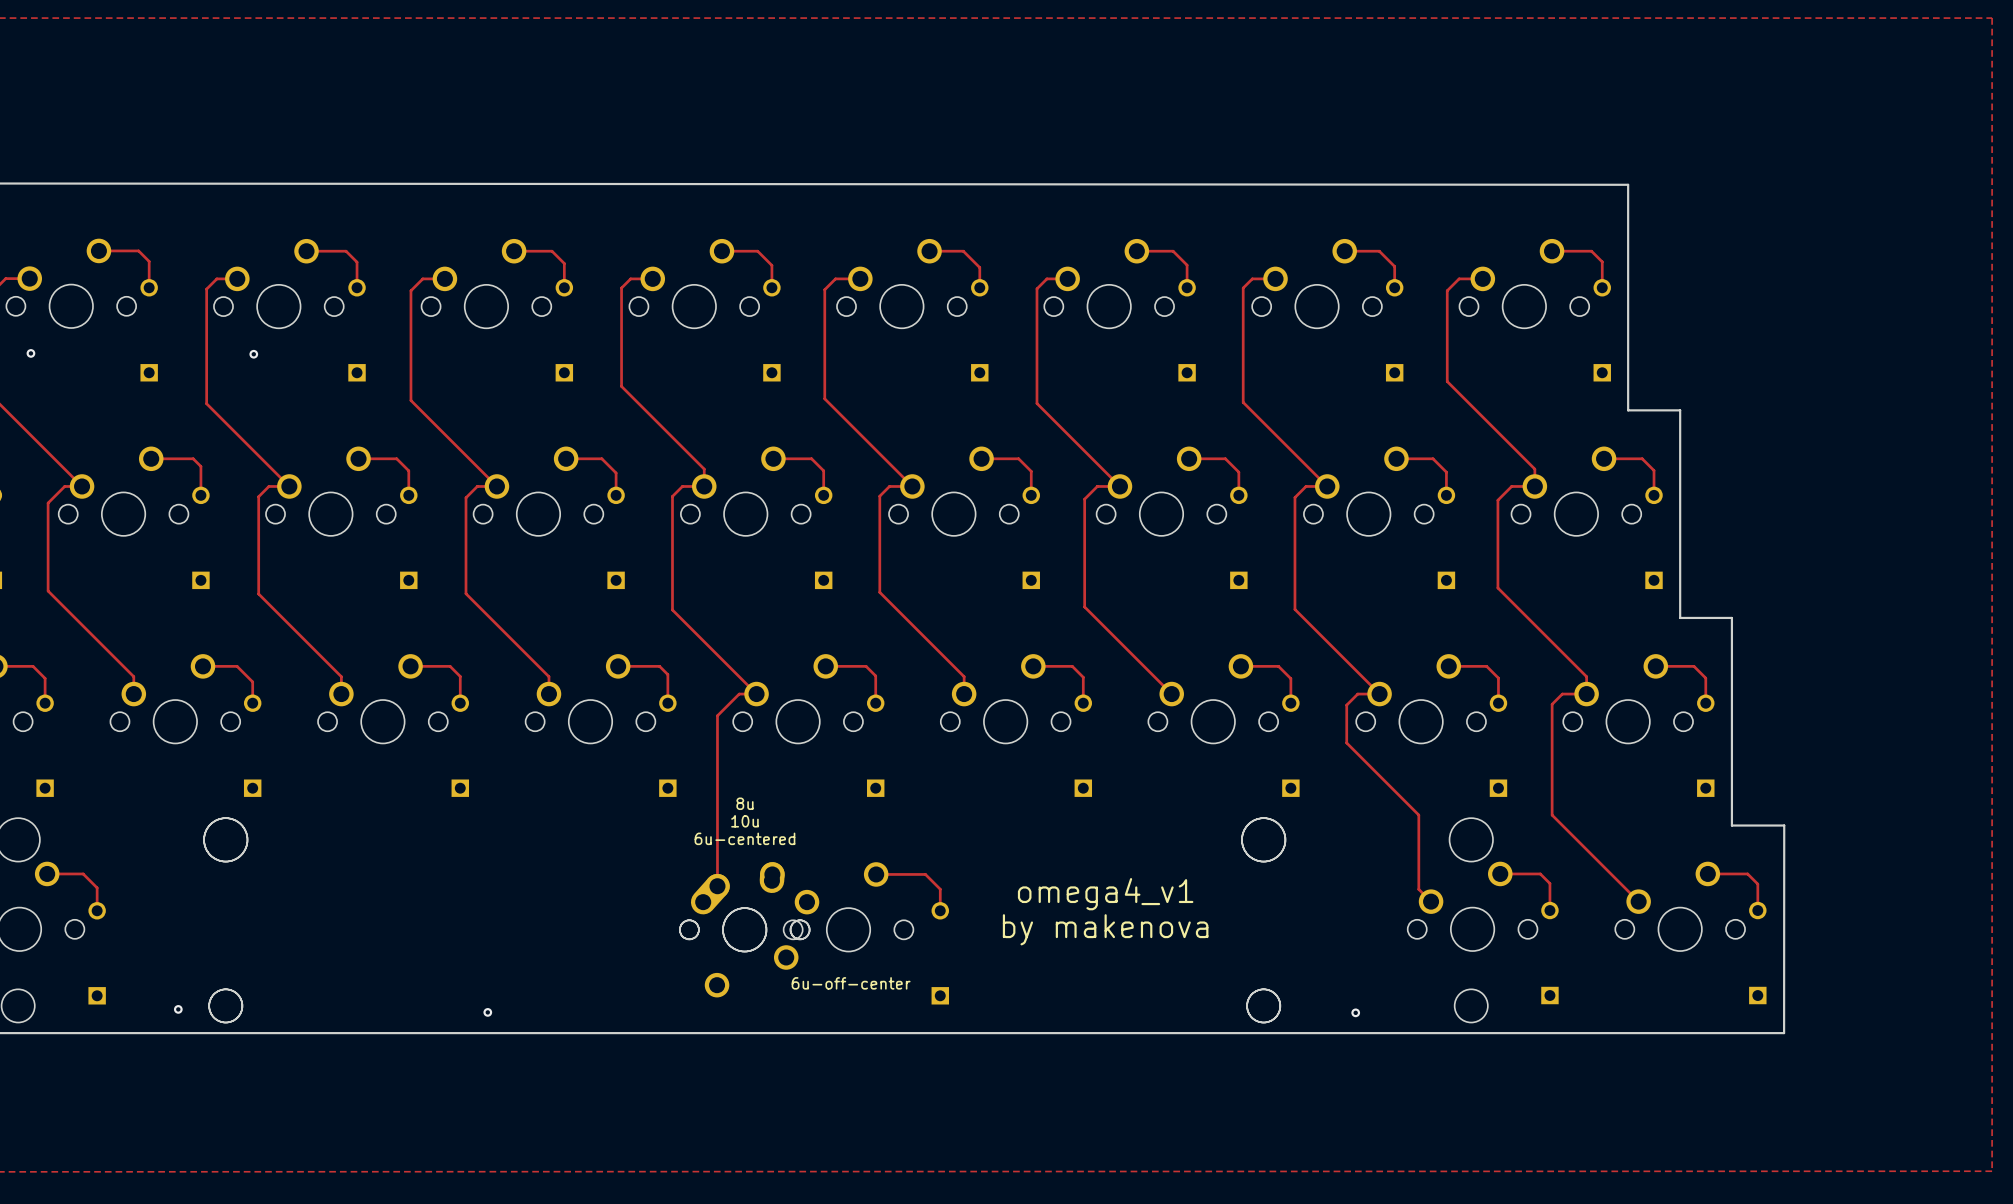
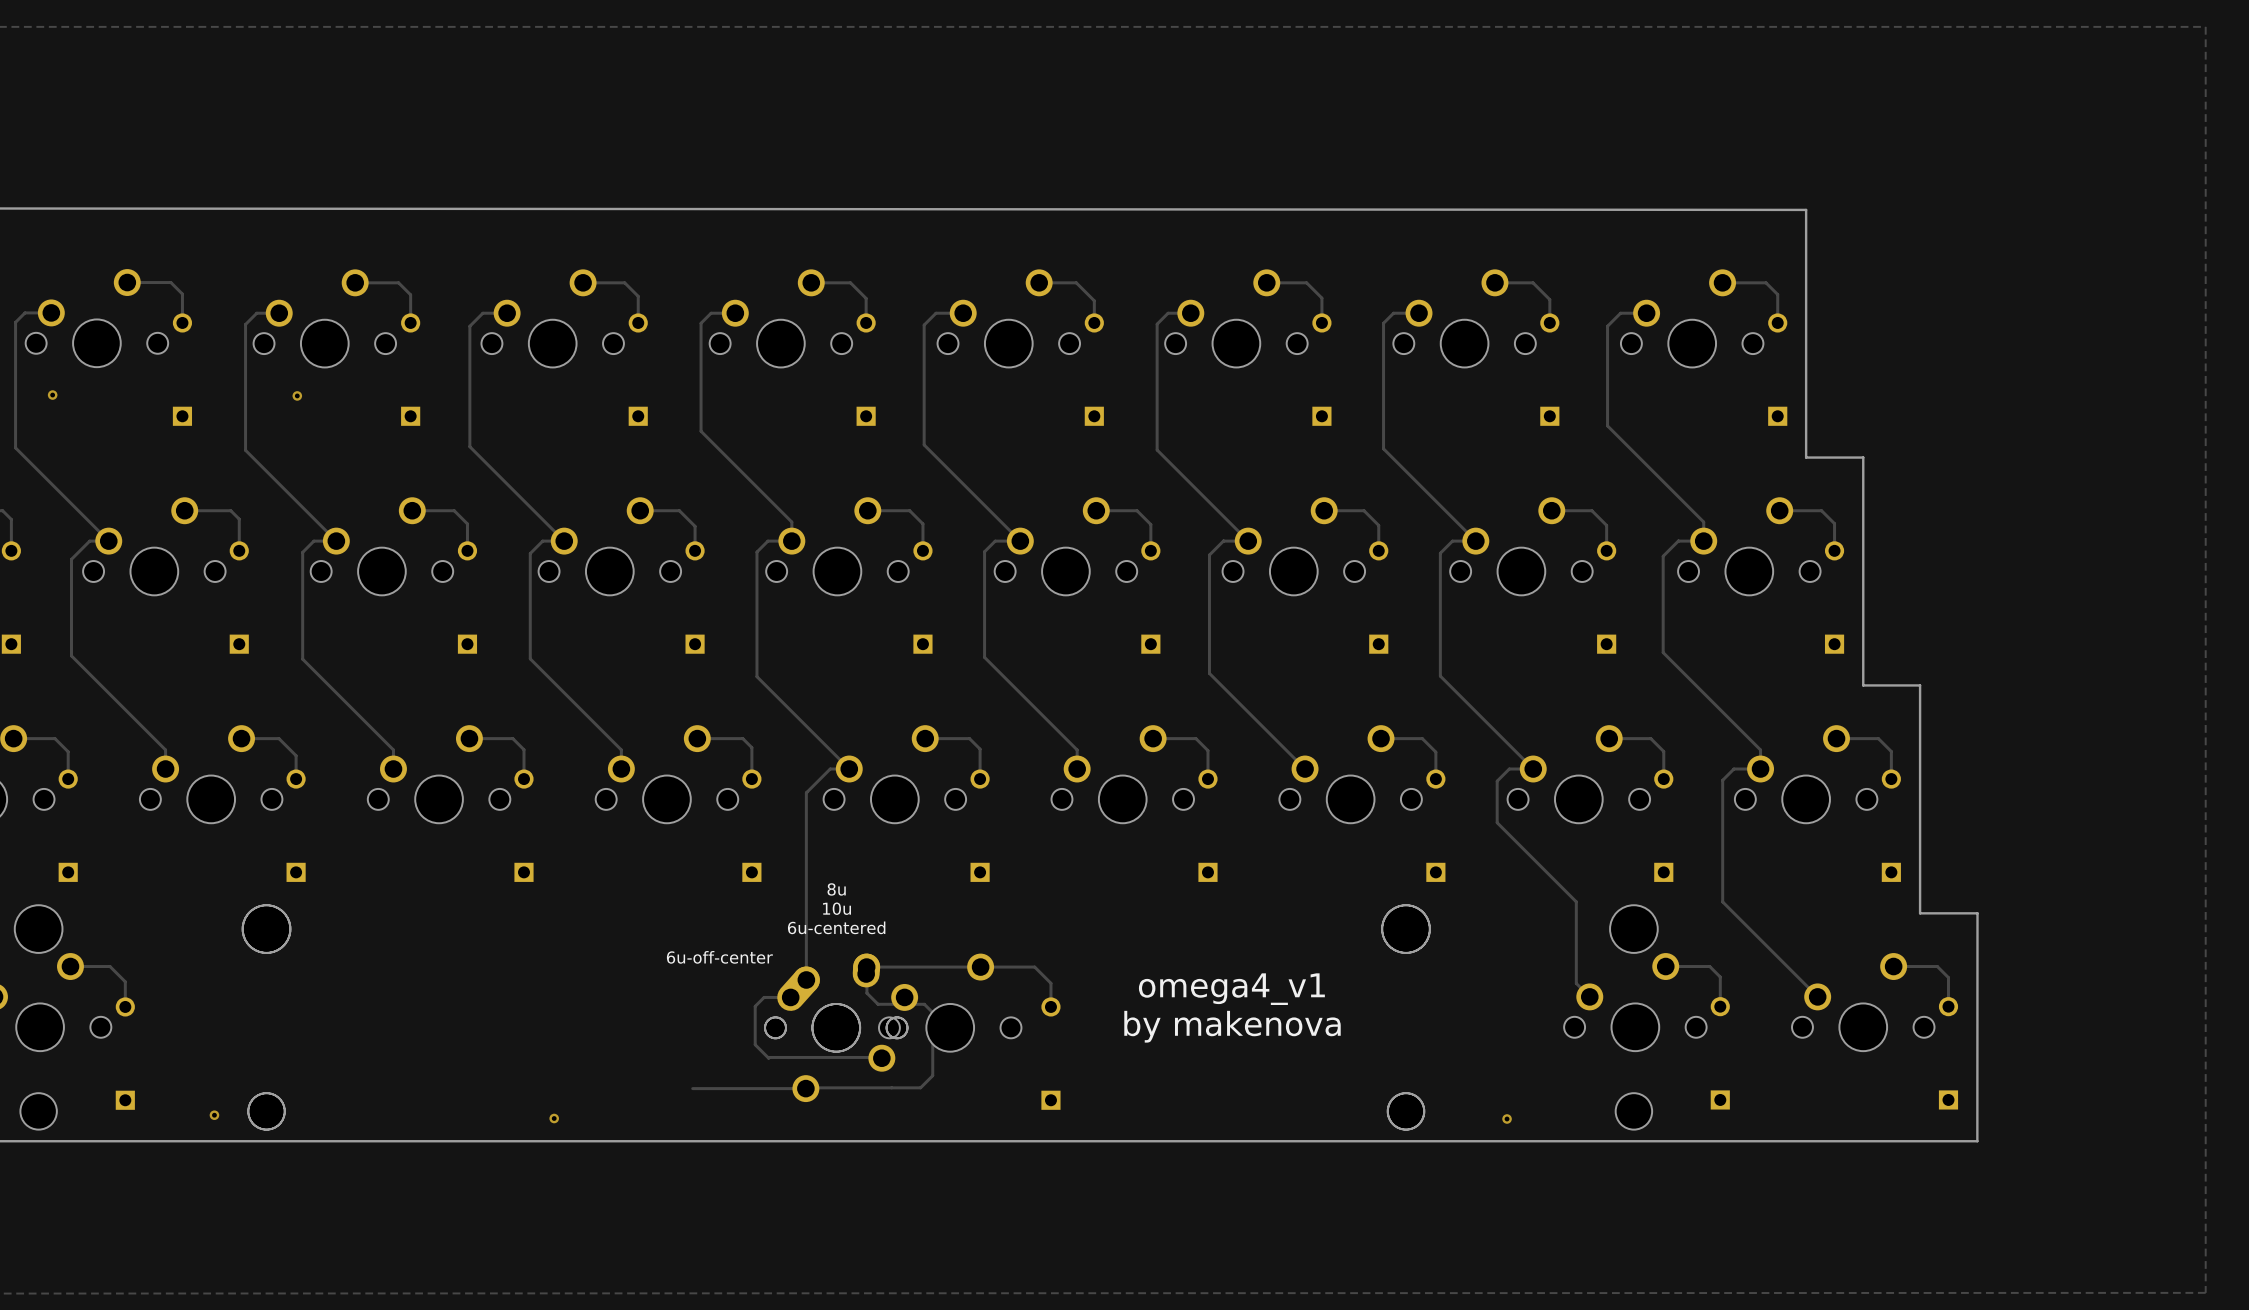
track: none -> (867, 967) (980, 967)
track: none -> (866, 974) (866, 993) (878, 1004) (924, 1004) (932, 1012) (932, 1075) (920, 1087) (805, 1087)
track: none -> (791, 997) (764, 997) (755, 1006) (755, 1044) (768, 1058) (881, 1057)
text position: 6u-off-center (851, 983) -> 6u-off-center (719, 957)
track: none -> (692, 1088) (805, 1088)

